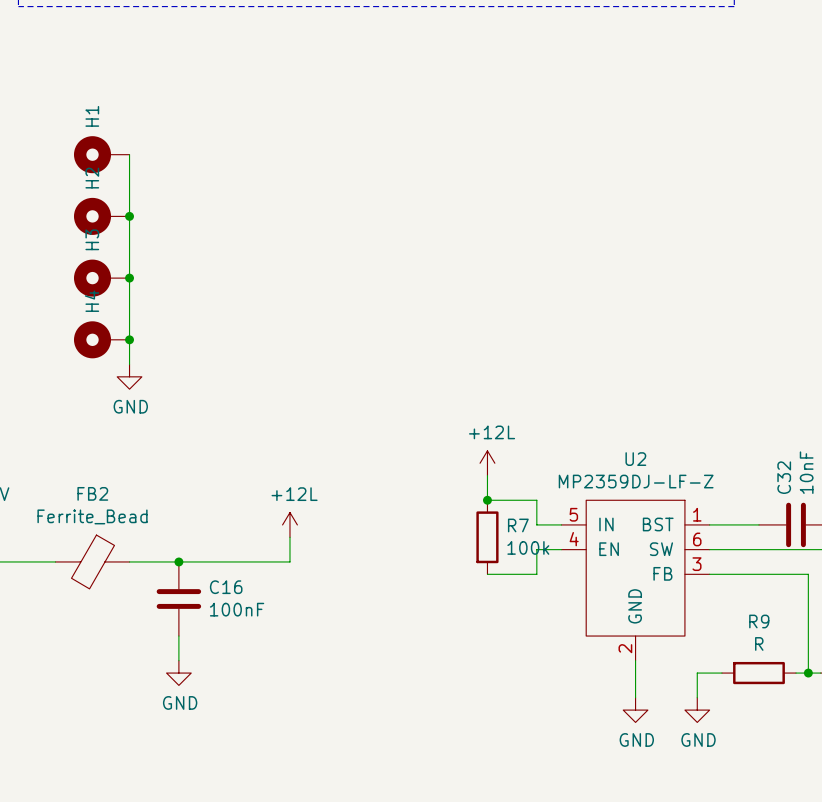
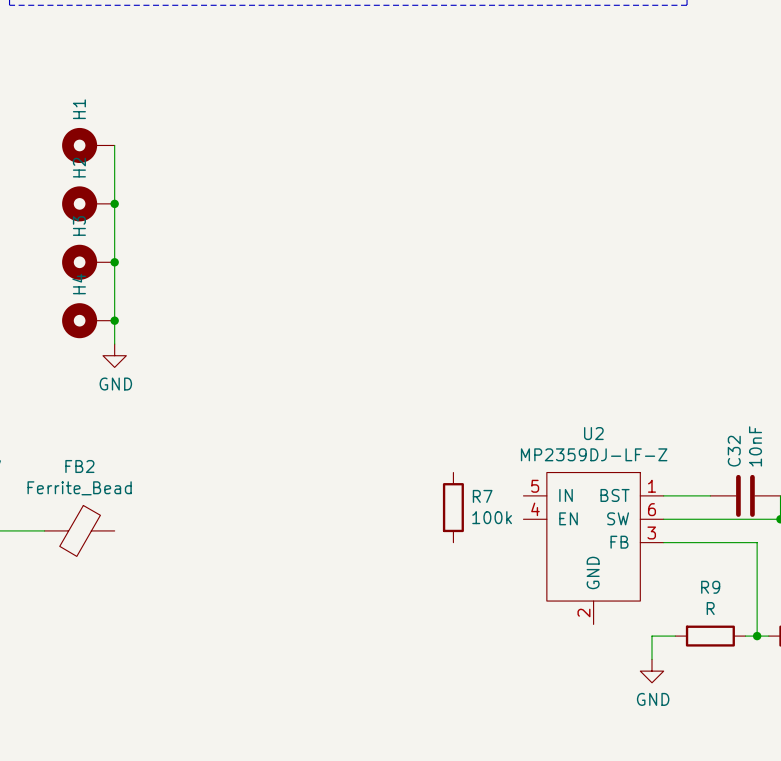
power symbol: +12L (487, 463) -> none
wire: (487, 475) (487, 500) (536, 500) (536, 524) (561, 524) -> none
junction: (487, 500) -> none
power symbol: +12L (289, 524) -> none
wire: (289, 537) (289, 561) (129, 561) -> none
wire: (561, 549) (536, 549) (536, 574) (487, 574) -> none
junction: (178, 561) -> none
C16: 100nF (178, 599) -> none
wire: (178, 636) (178, 660) -> none
wire: (635, 660) (635, 697) -> none
power symbol: GND (178, 673) -> none
power symbol: GND (635, 710) -> none

